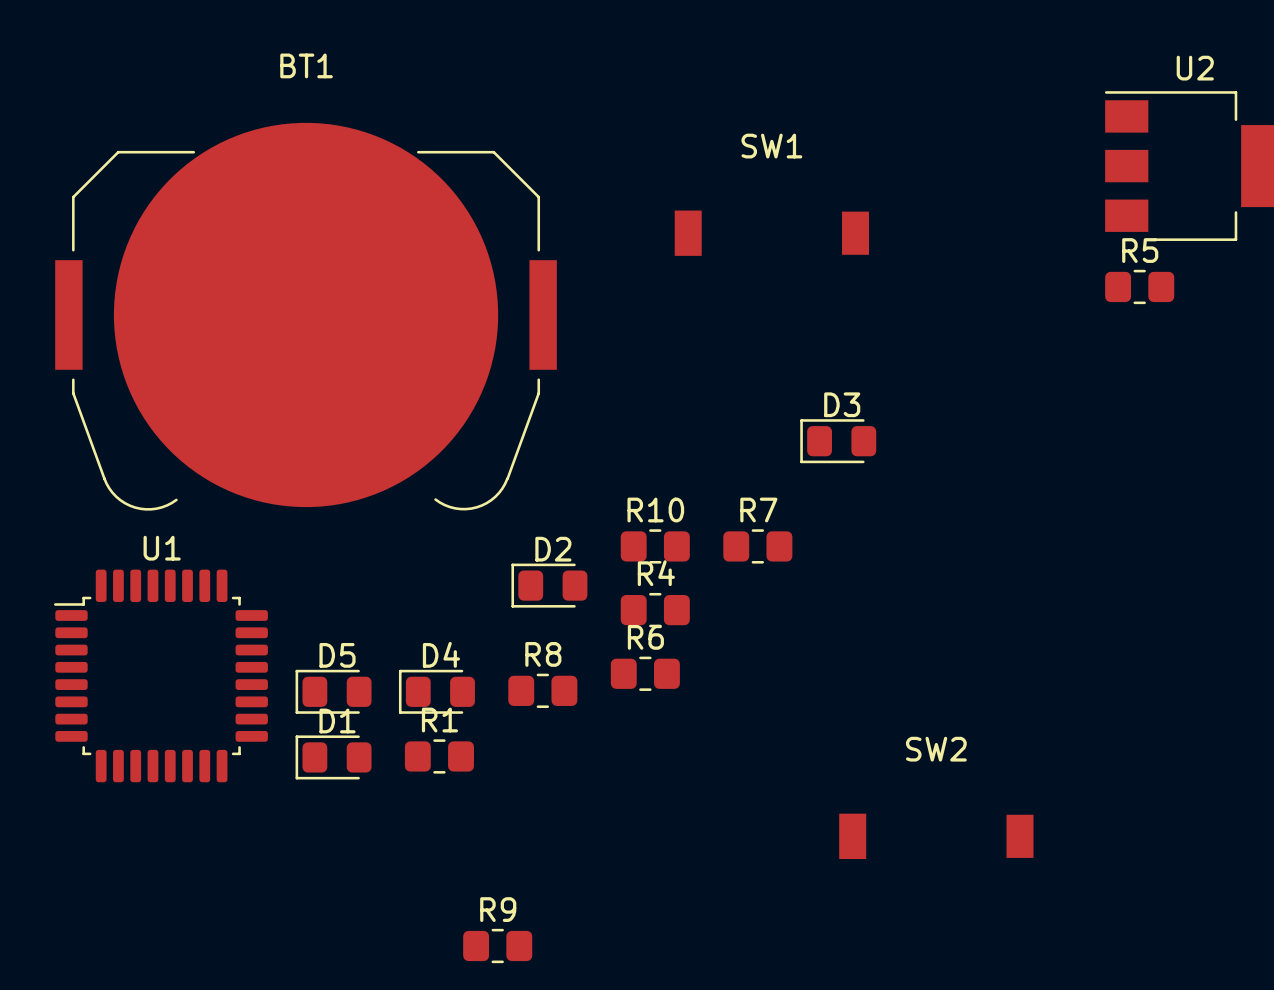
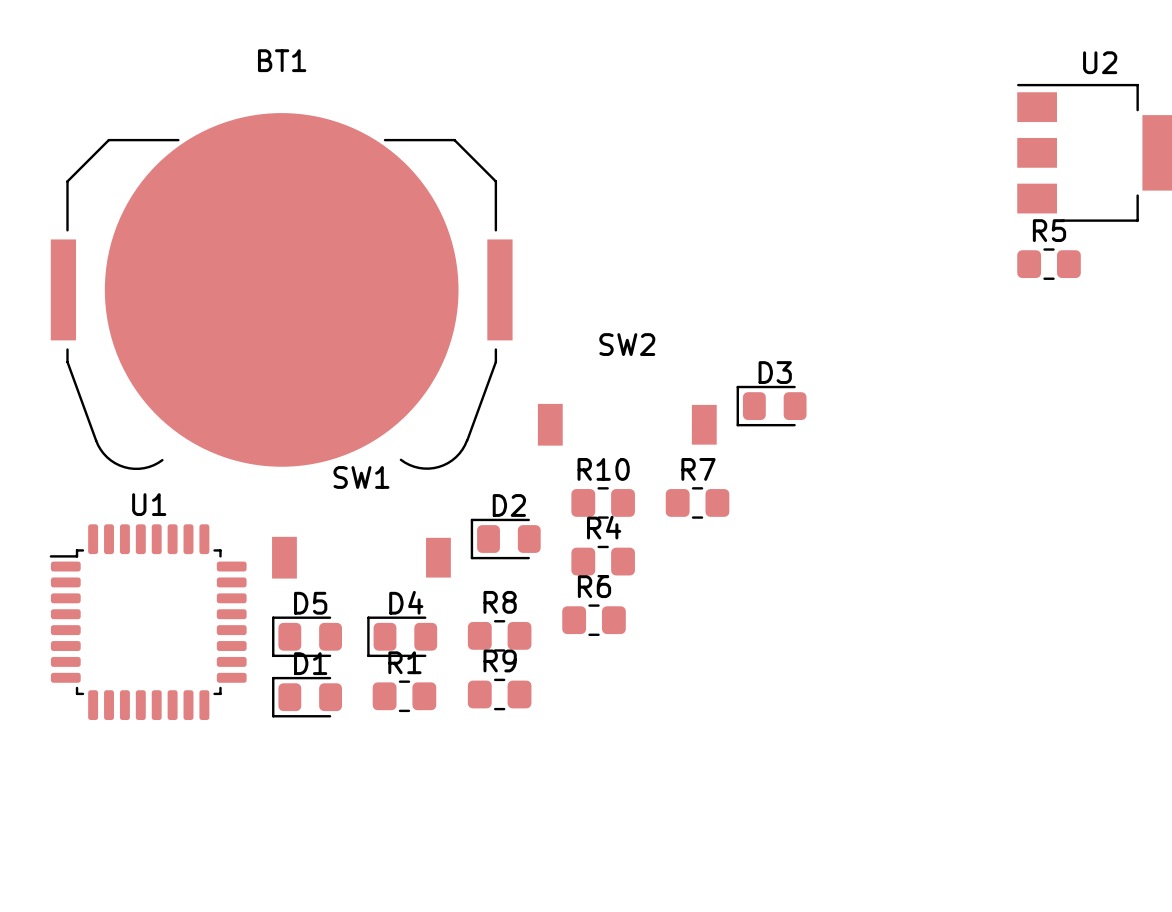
SW1 position: (771, 233) -> (361, 557)
SW2 position: (936, 836) -> (627, 424)
R9 position: (497, 945) -> (499, 694)

